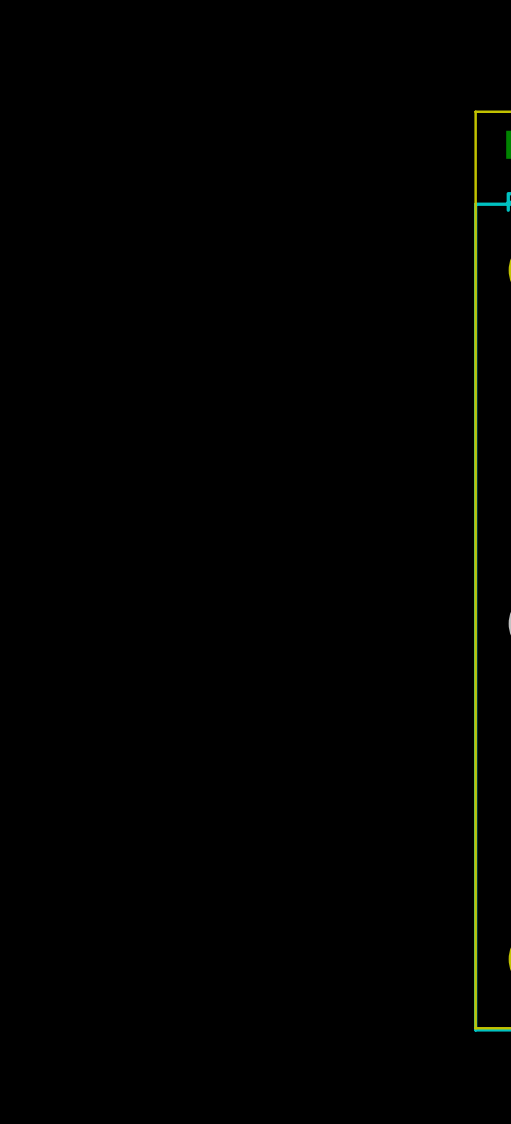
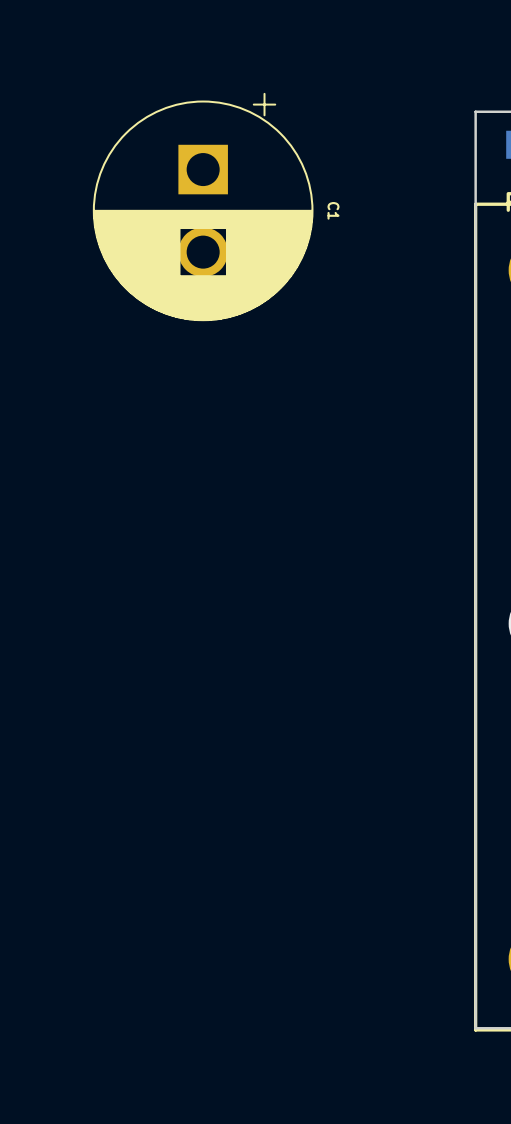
C1: none -> (203, 207)

